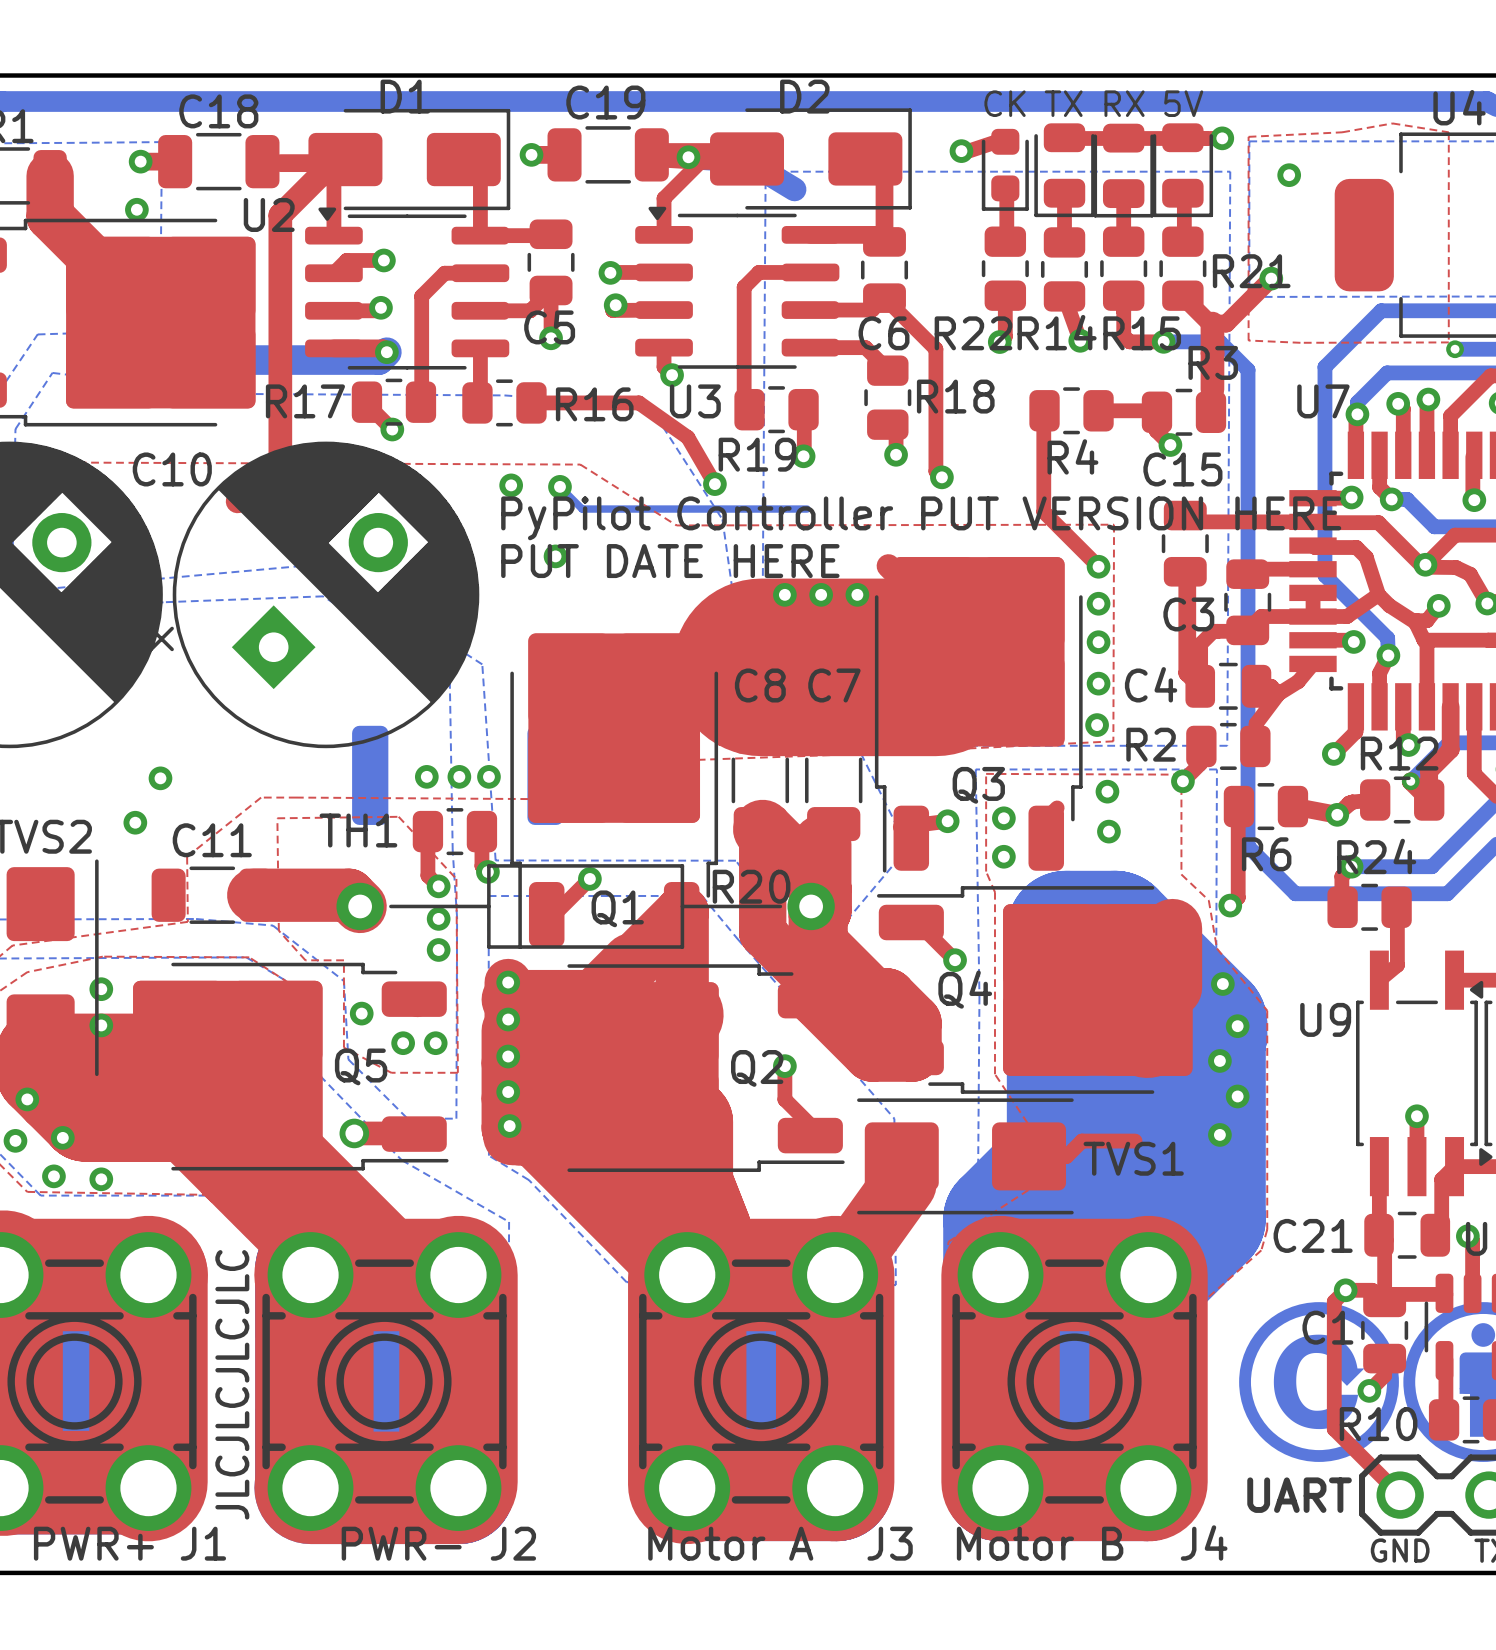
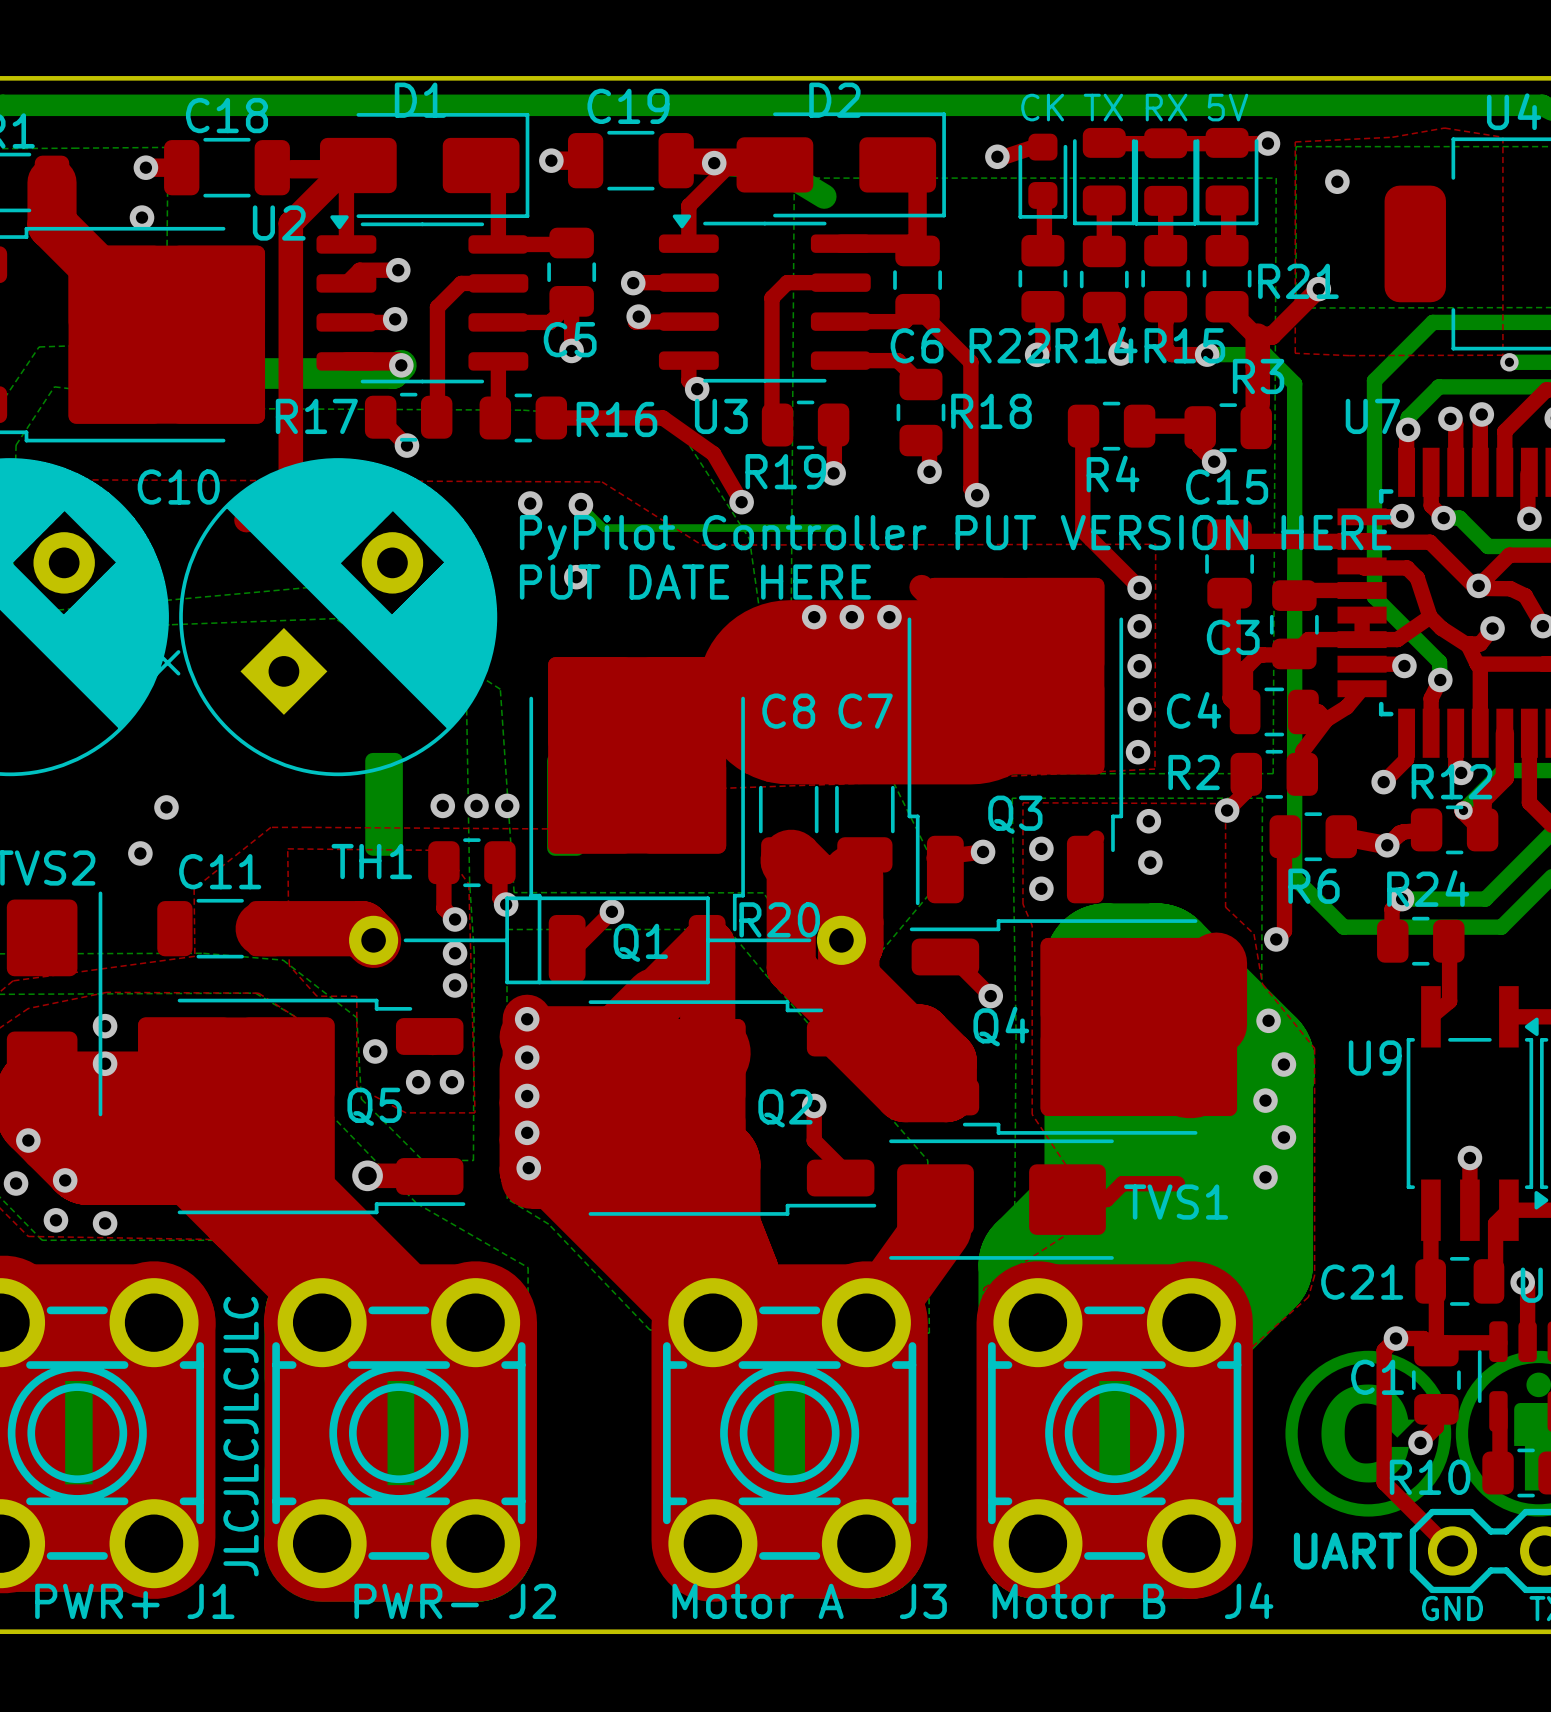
top zone outline: (277, 818) (398, 816) (456, 878) (457, 1072) -> (287, 848) (444, 850) (468, 884) (475, 1112)

